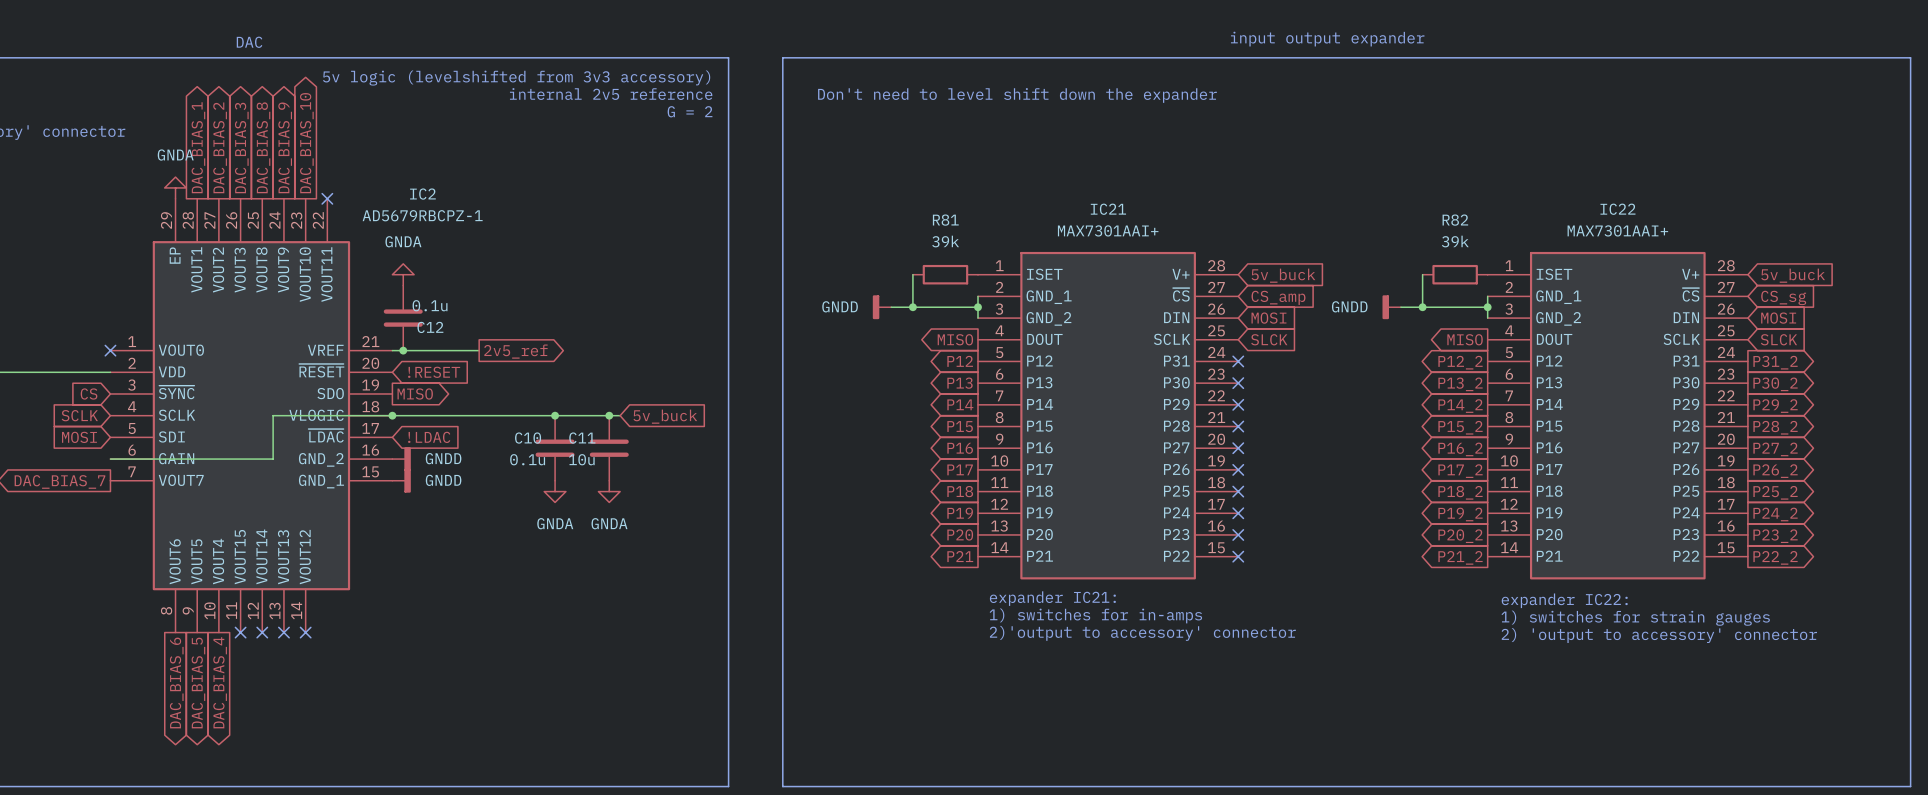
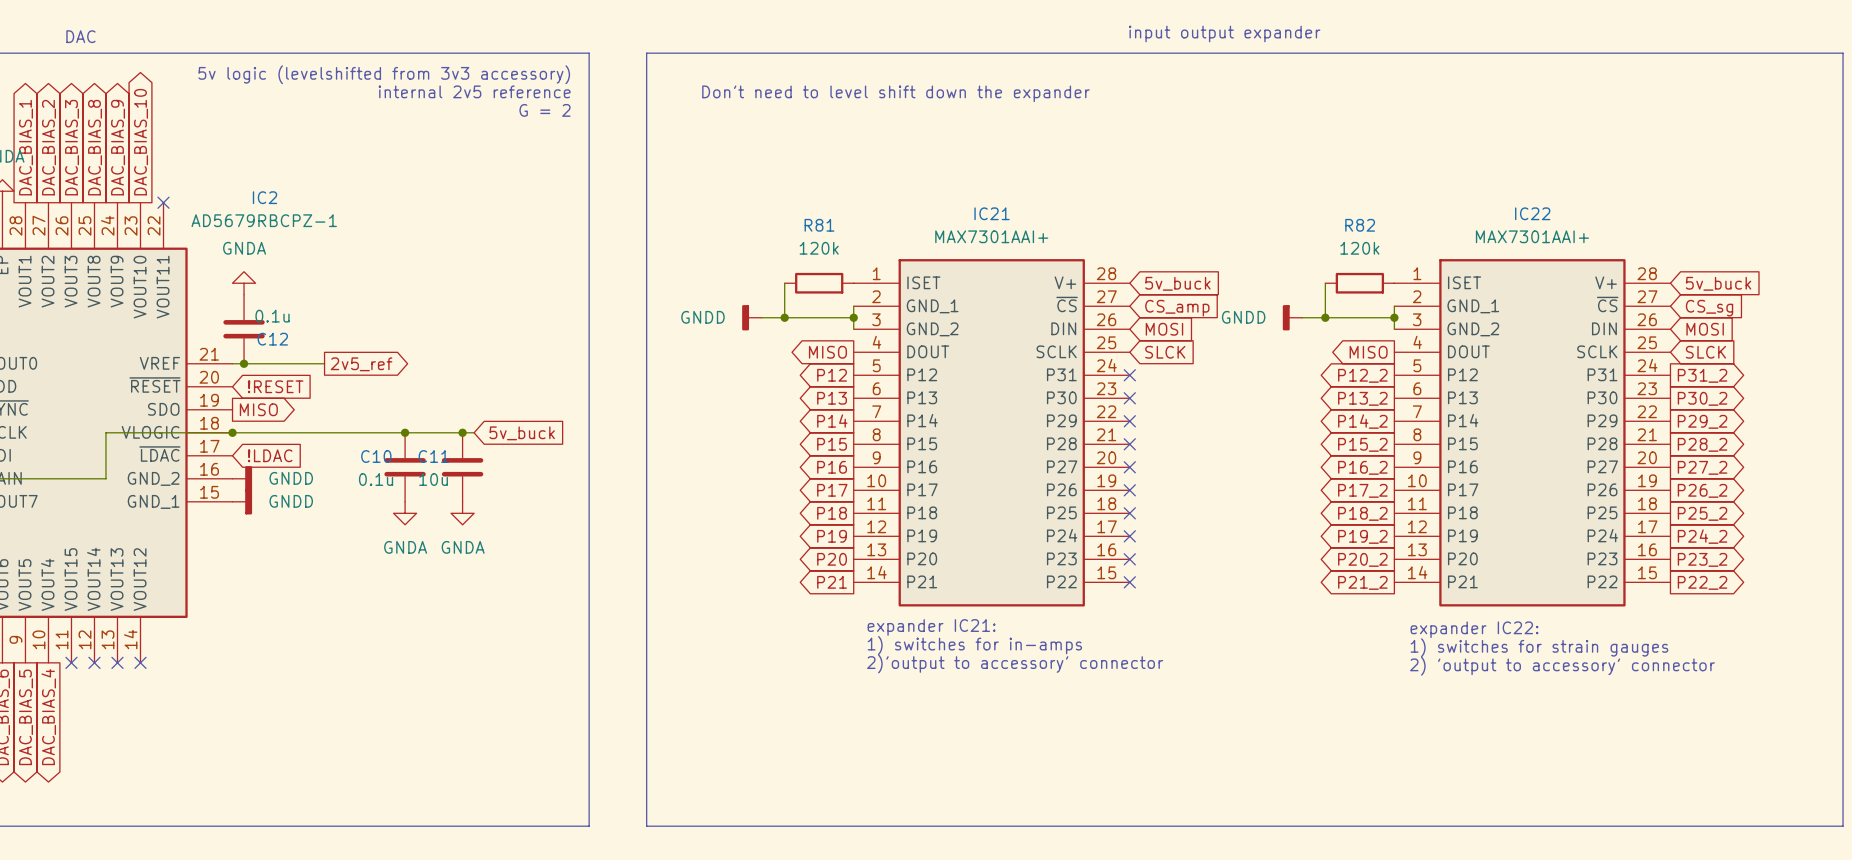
R81 value: 39k (945, 241) -> 120k (819, 248)
R82 value: 39k (1455, 241) -> 120k (1359, 248)

